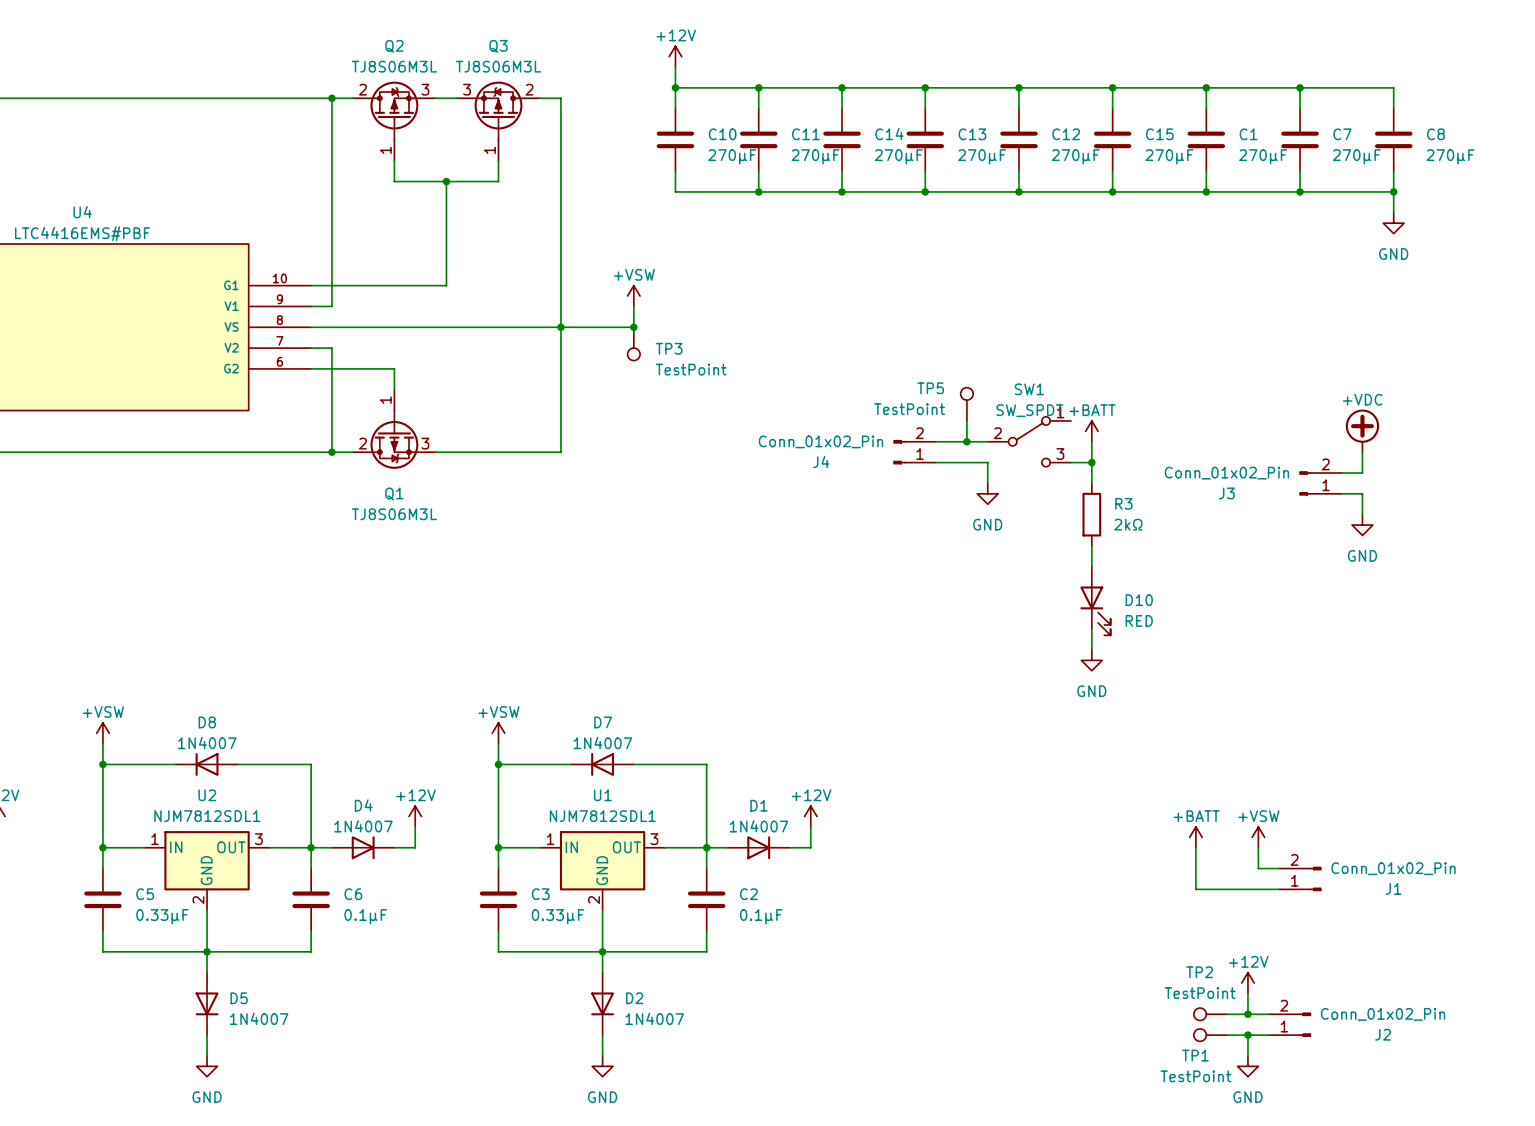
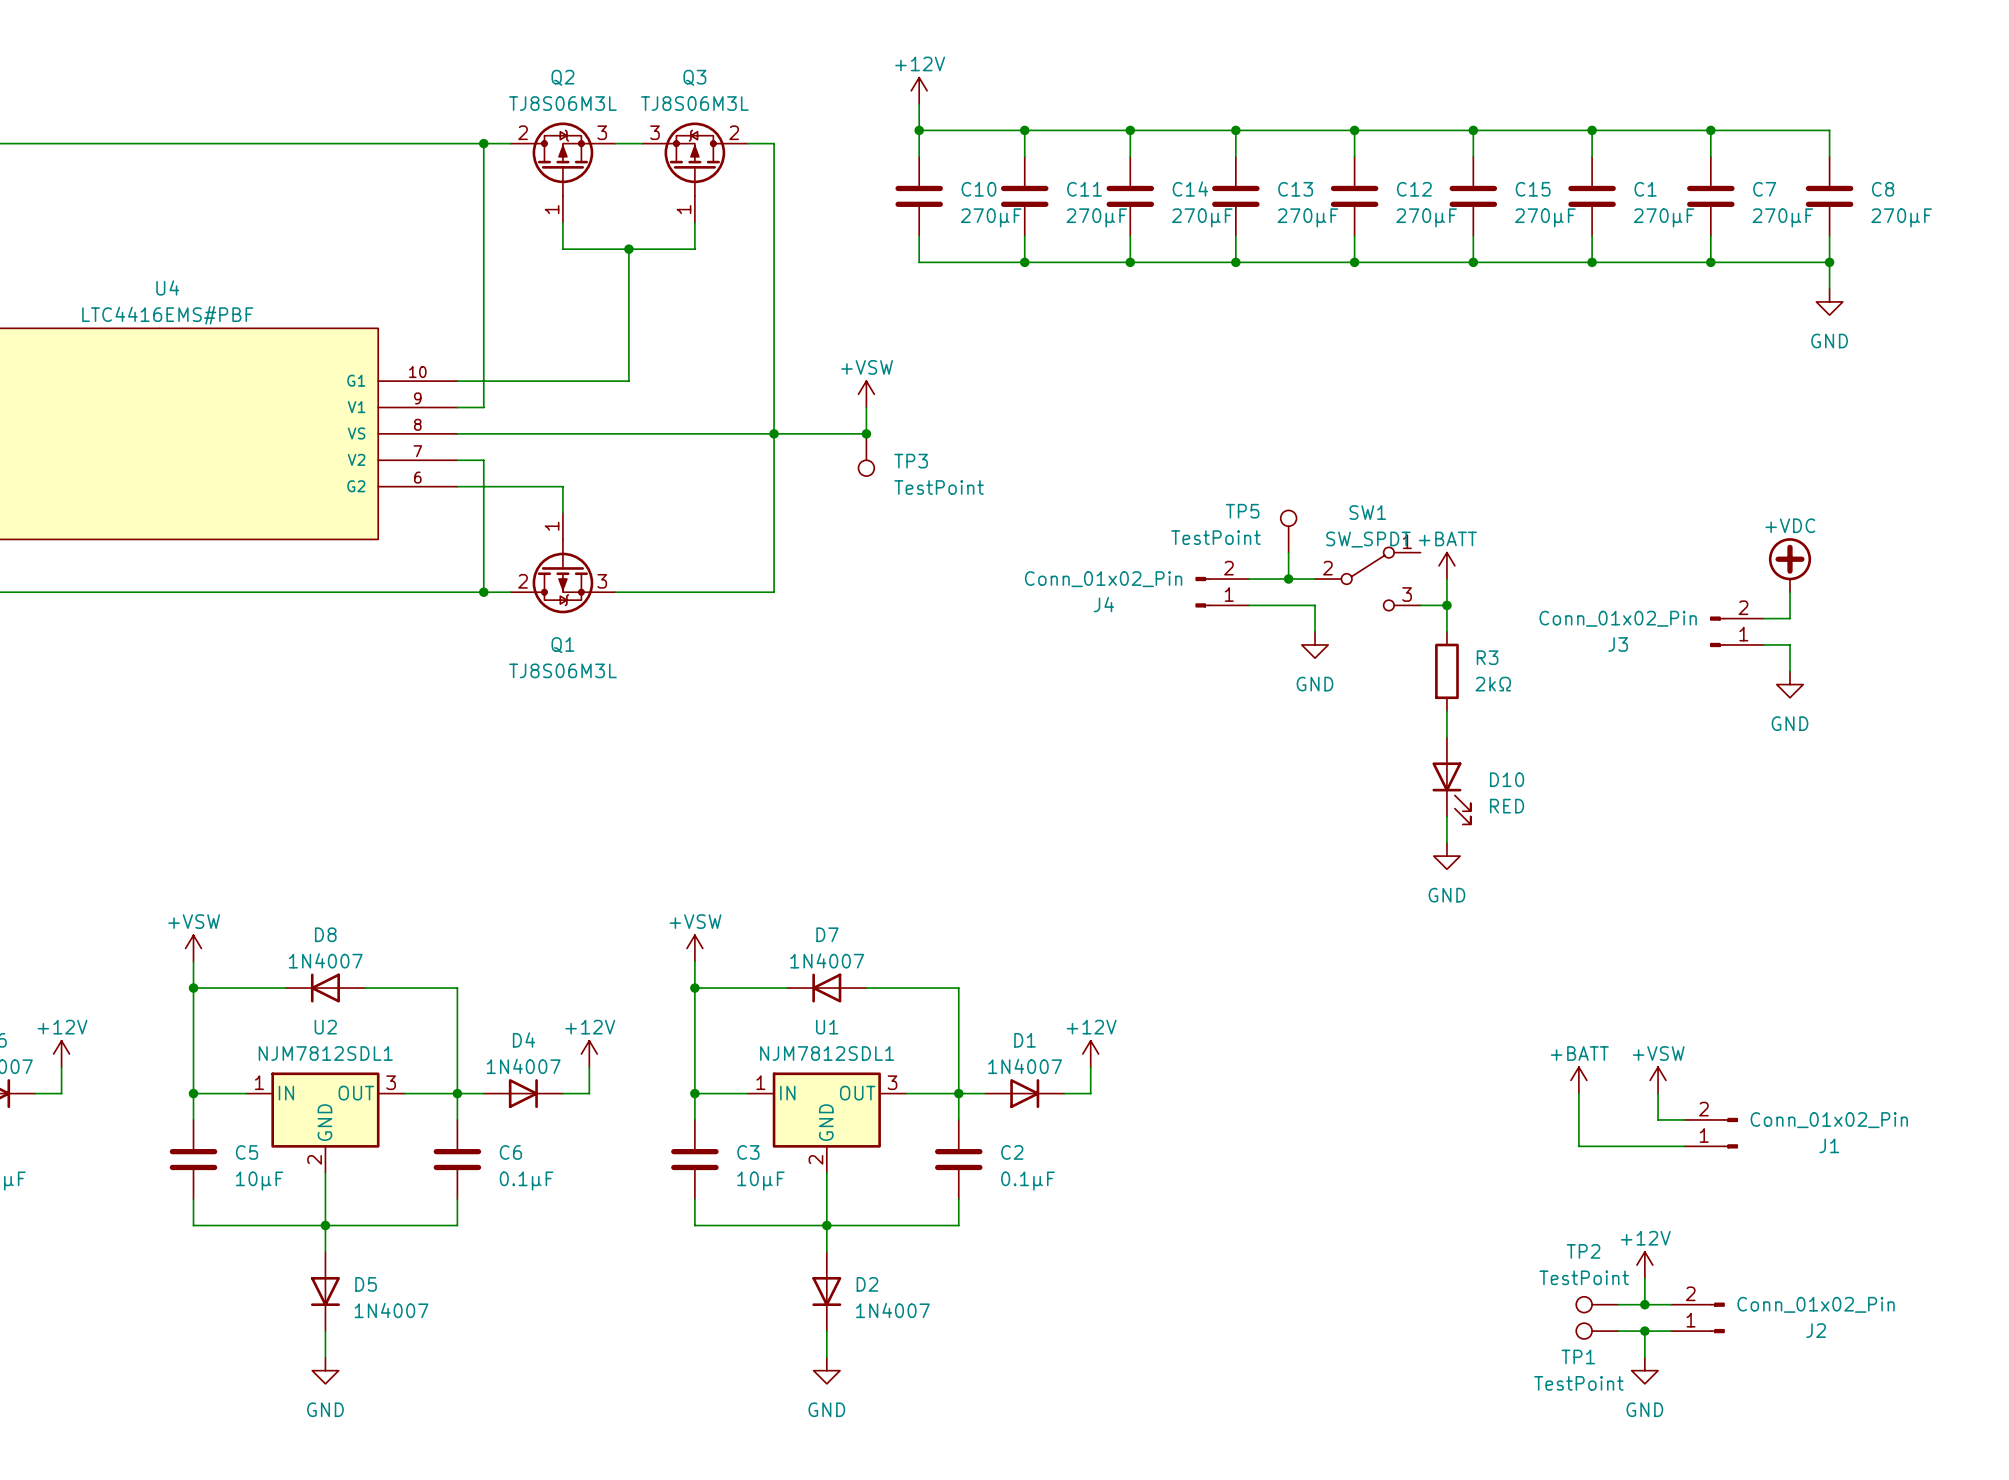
C5 value: 0.33μF (162, 916) -> 10μF (259, 1181)
C3 value: 0.33μF (558, 916) -> 10μF (760, 1181)

